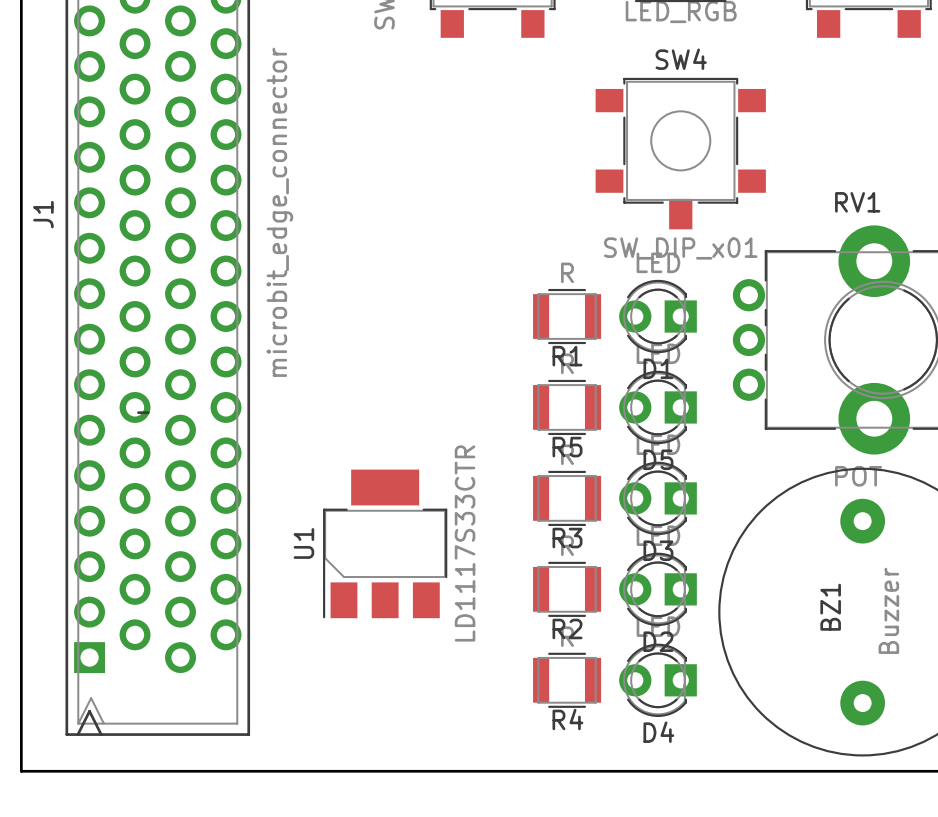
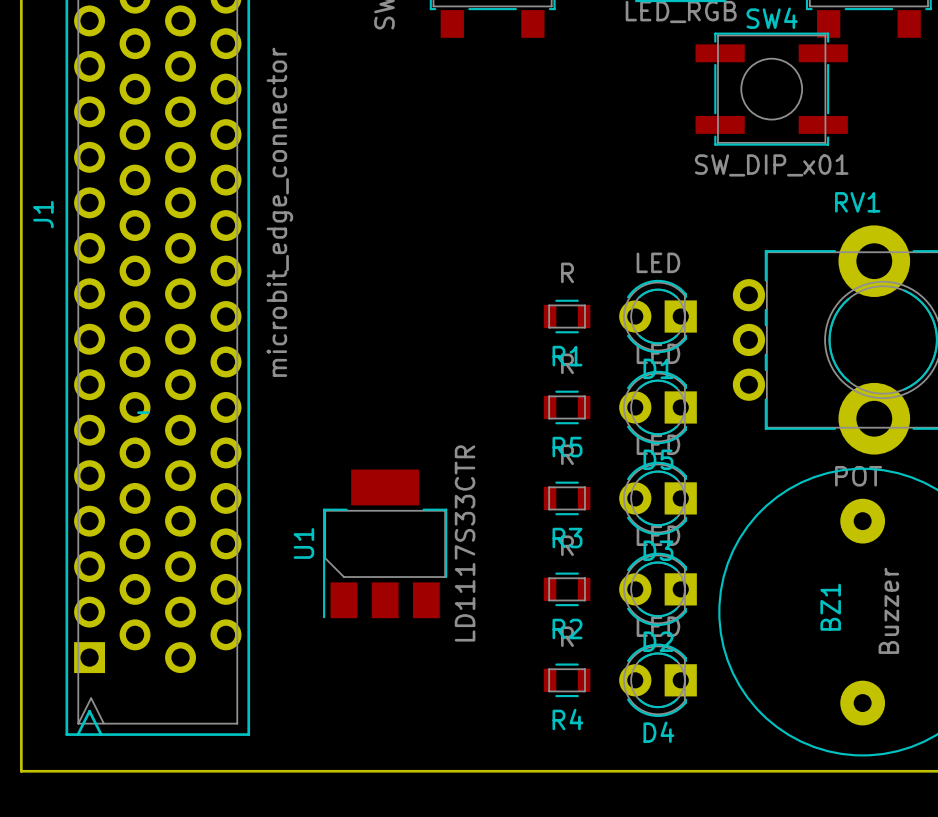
SW4 footprint: [595, 77, 766, 230] -> [695, 32, 848, 146]
R1 footprint: [533, 288, 602, 345] -> [543, 299, 591, 334]
R5 footprint: [533, 379, 602, 436] -> [543, 390, 591, 425]
R3 footprint: [533, 470, 602, 526] -> [543, 481, 591, 516]
R2 footprint: [533, 561, 602, 617] -> [543, 572, 591, 607]
R4 footprint: [533, 652, 602, 708] -> [543, 663, 591, 698]

